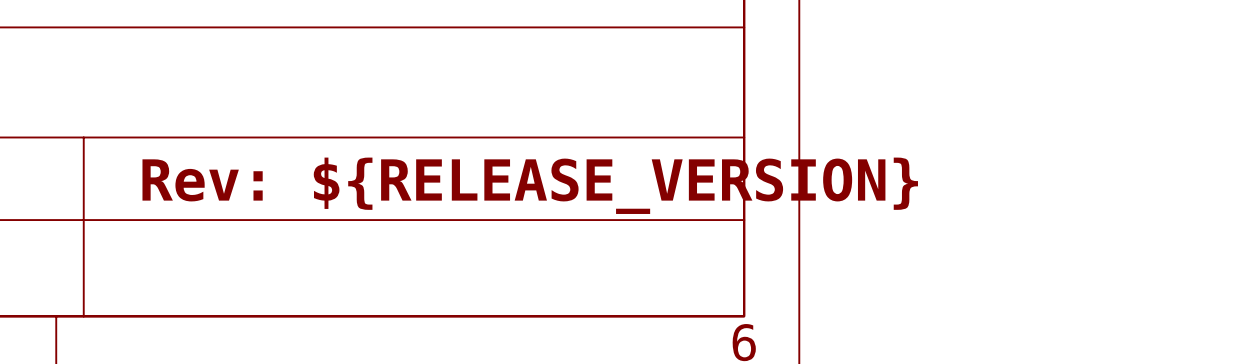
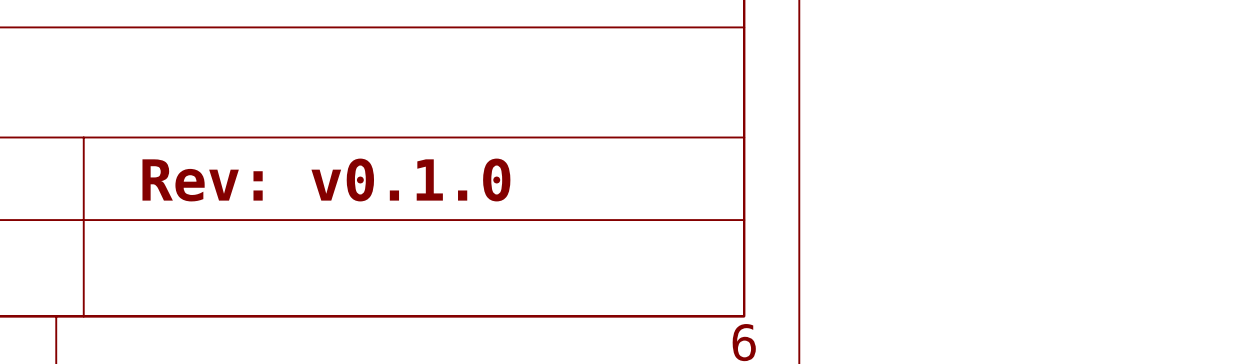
title block: Rev: ${RELEASE_VERSION} (530, 185) -> Rev: v0.1.0 (326, 180)

